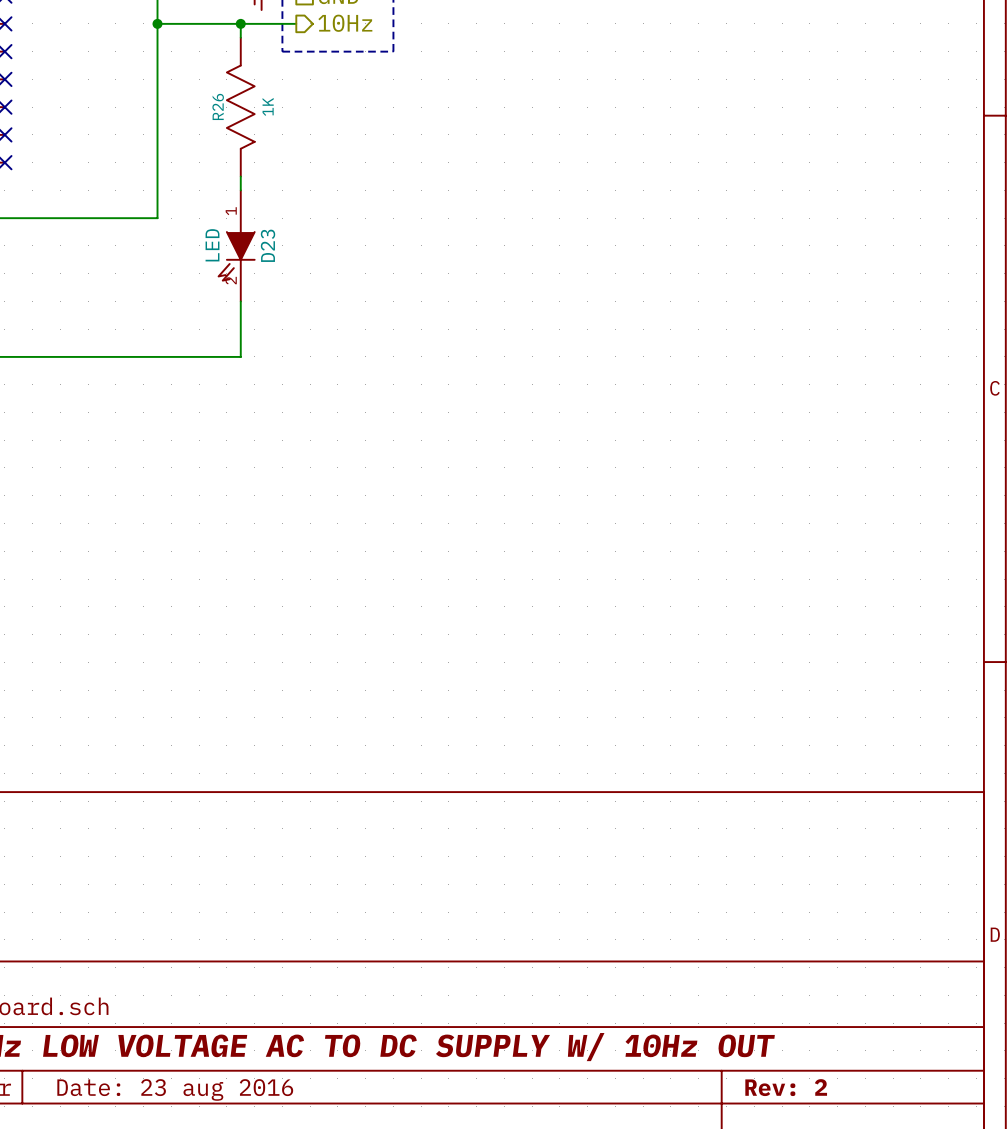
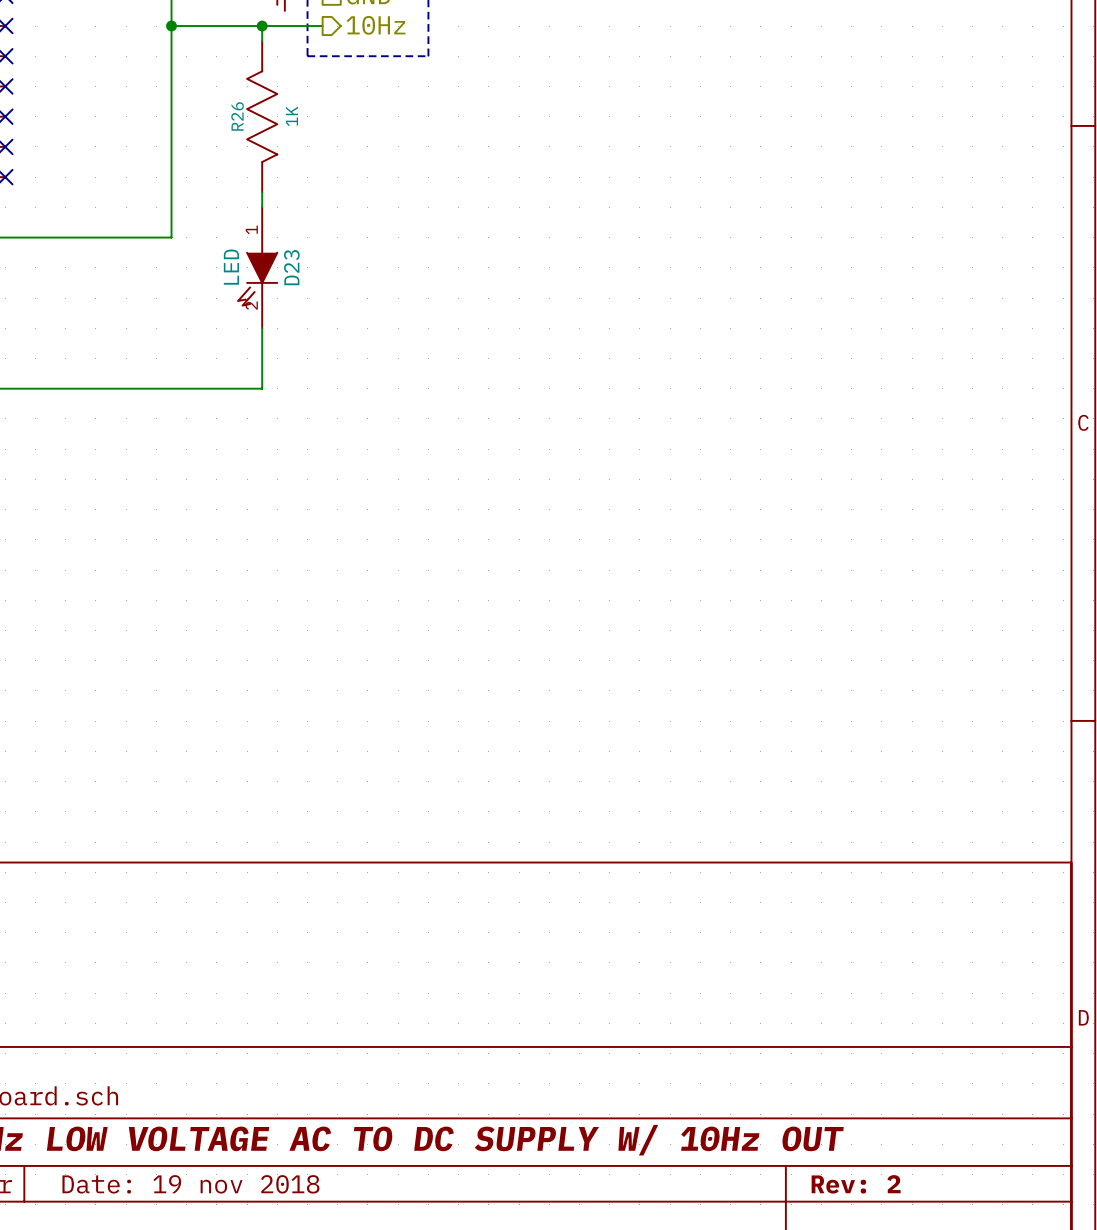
title block: Date: 23 aug 2016 (175, 1089) -> Date: 19 nov 2018 (190, 1184)

